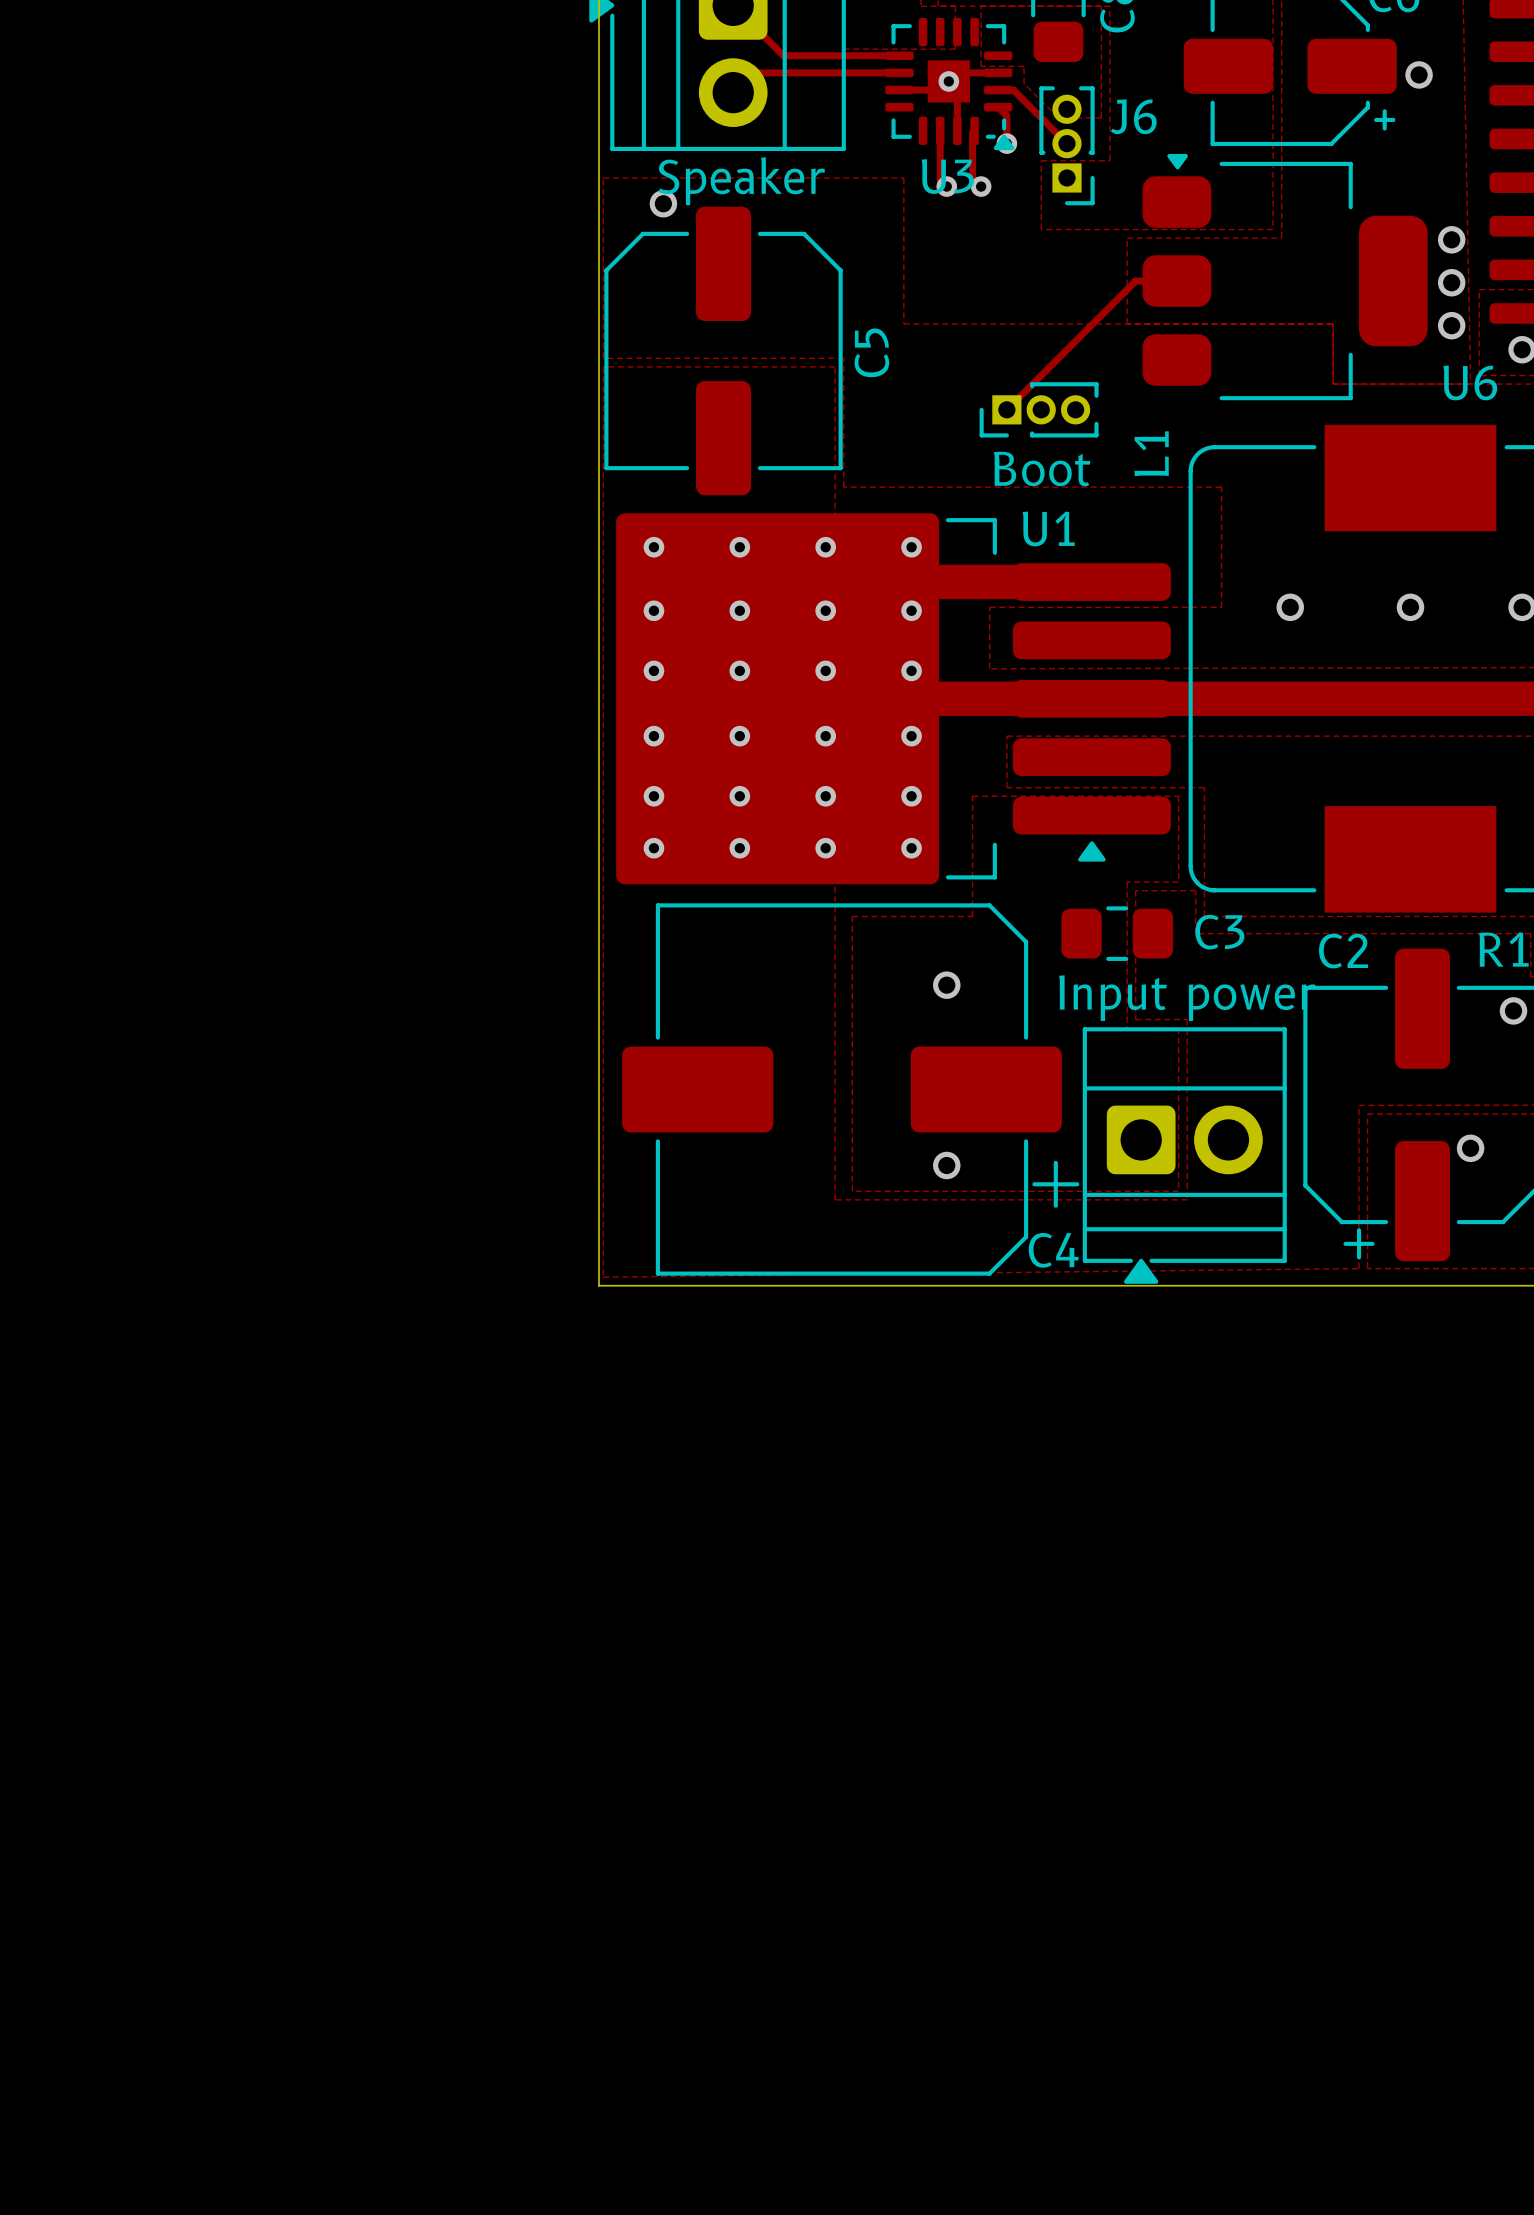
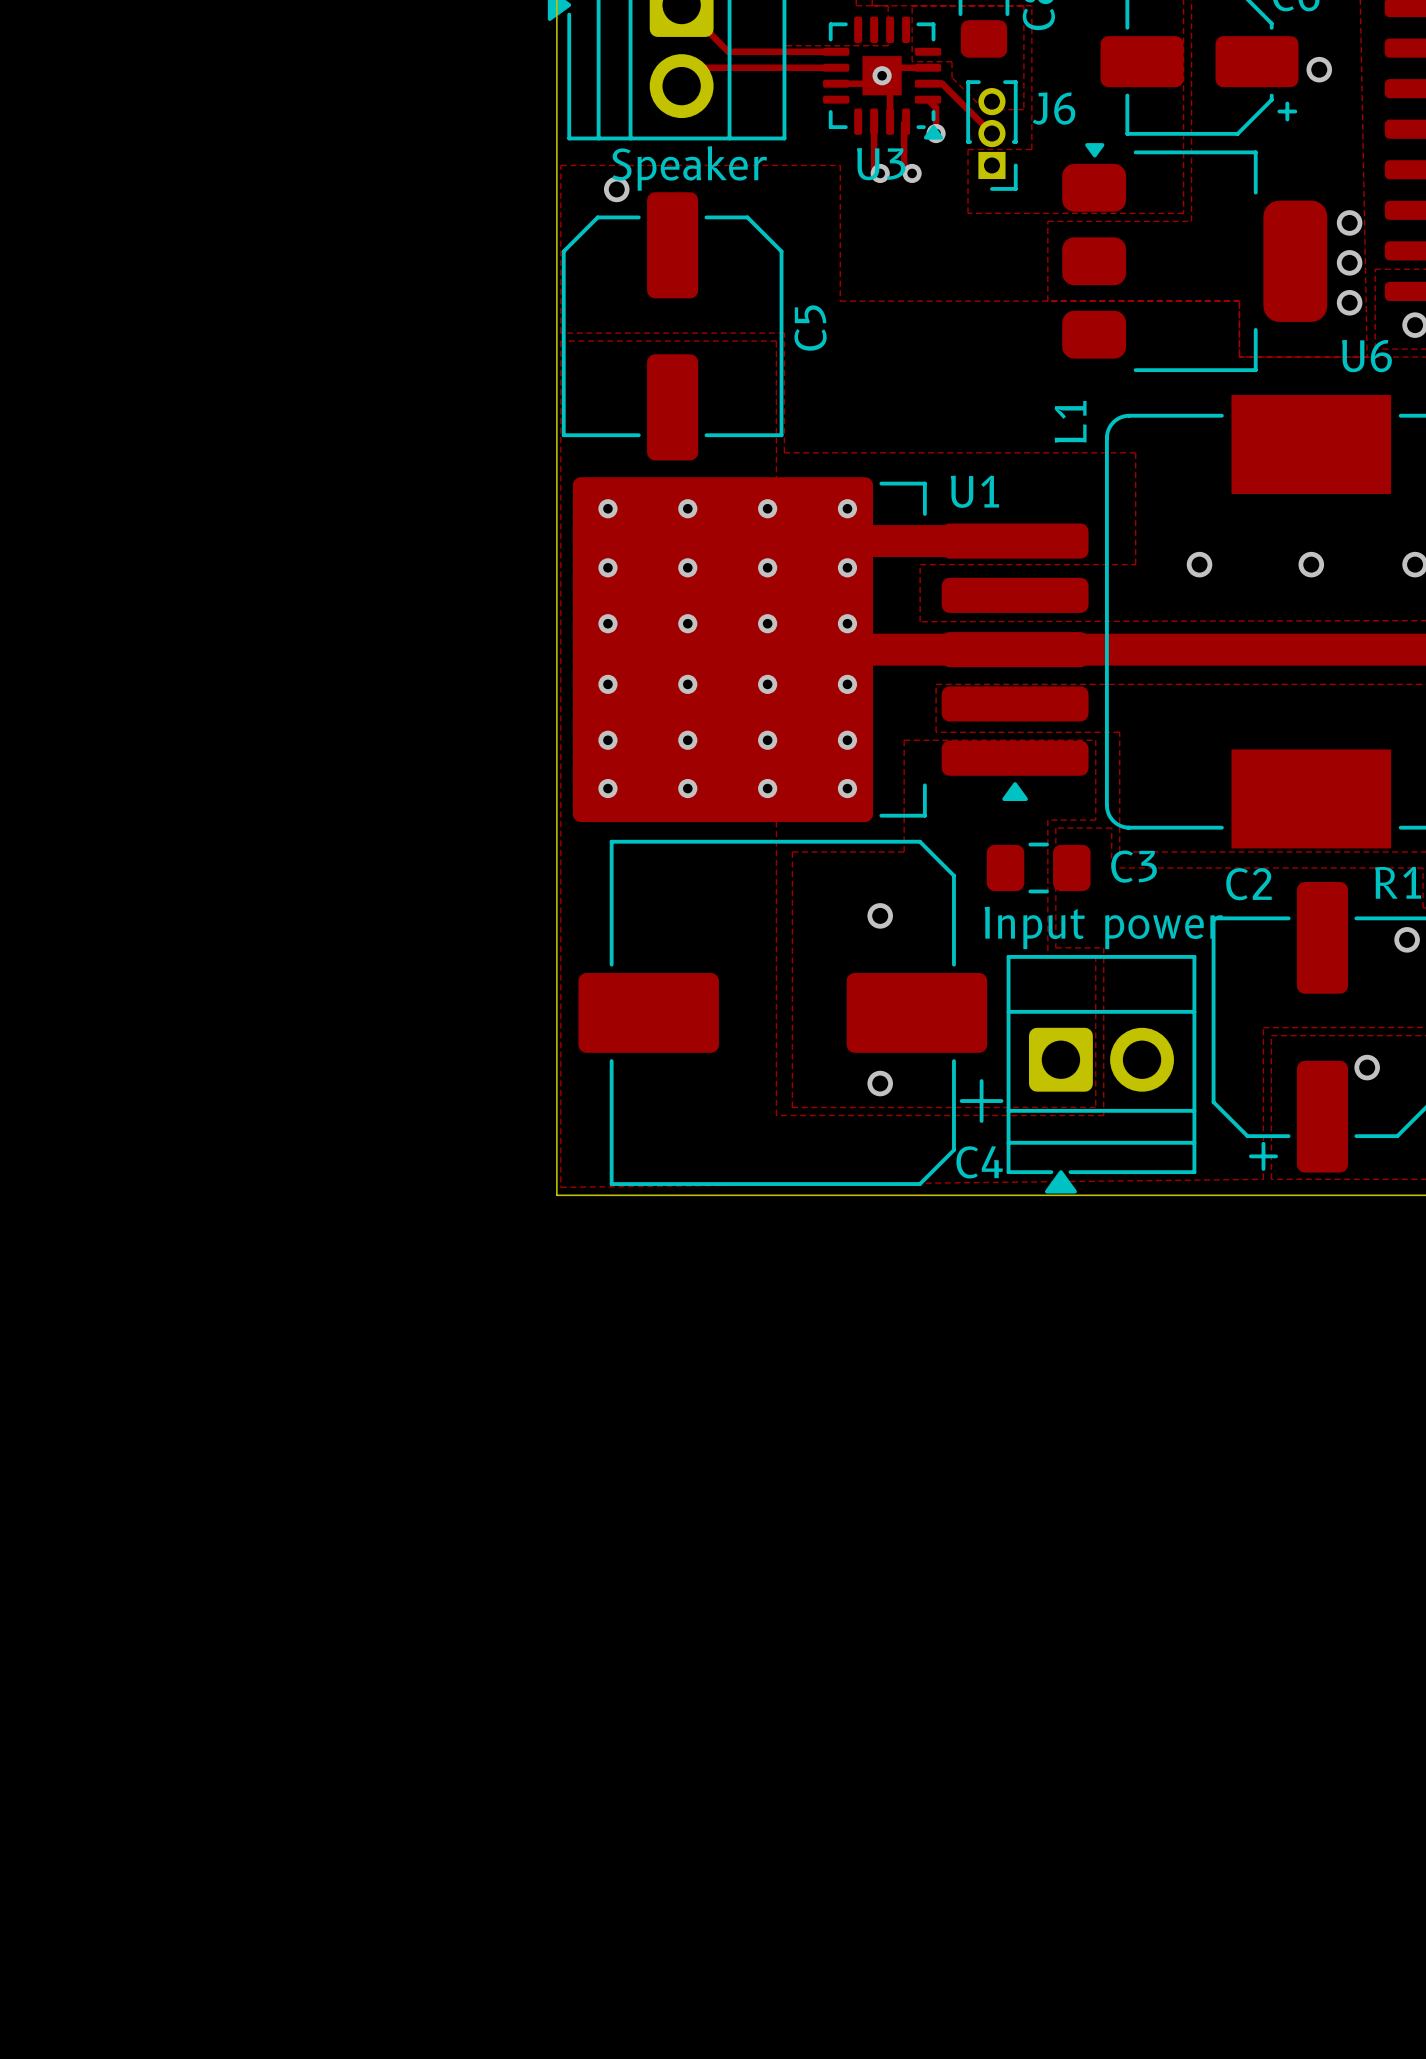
track: (1176, 281) (1135, 281) (1006, 409) -> none
part: Boot (1039, 409) -> none

